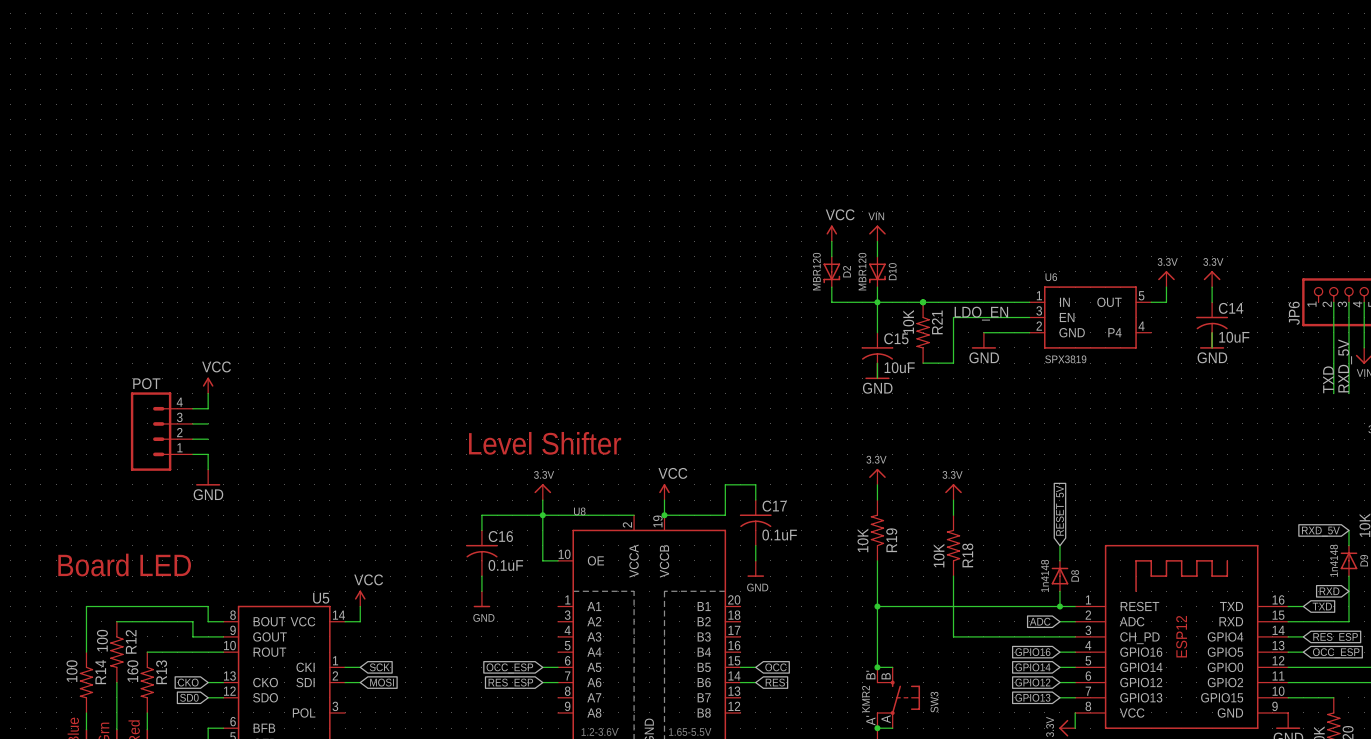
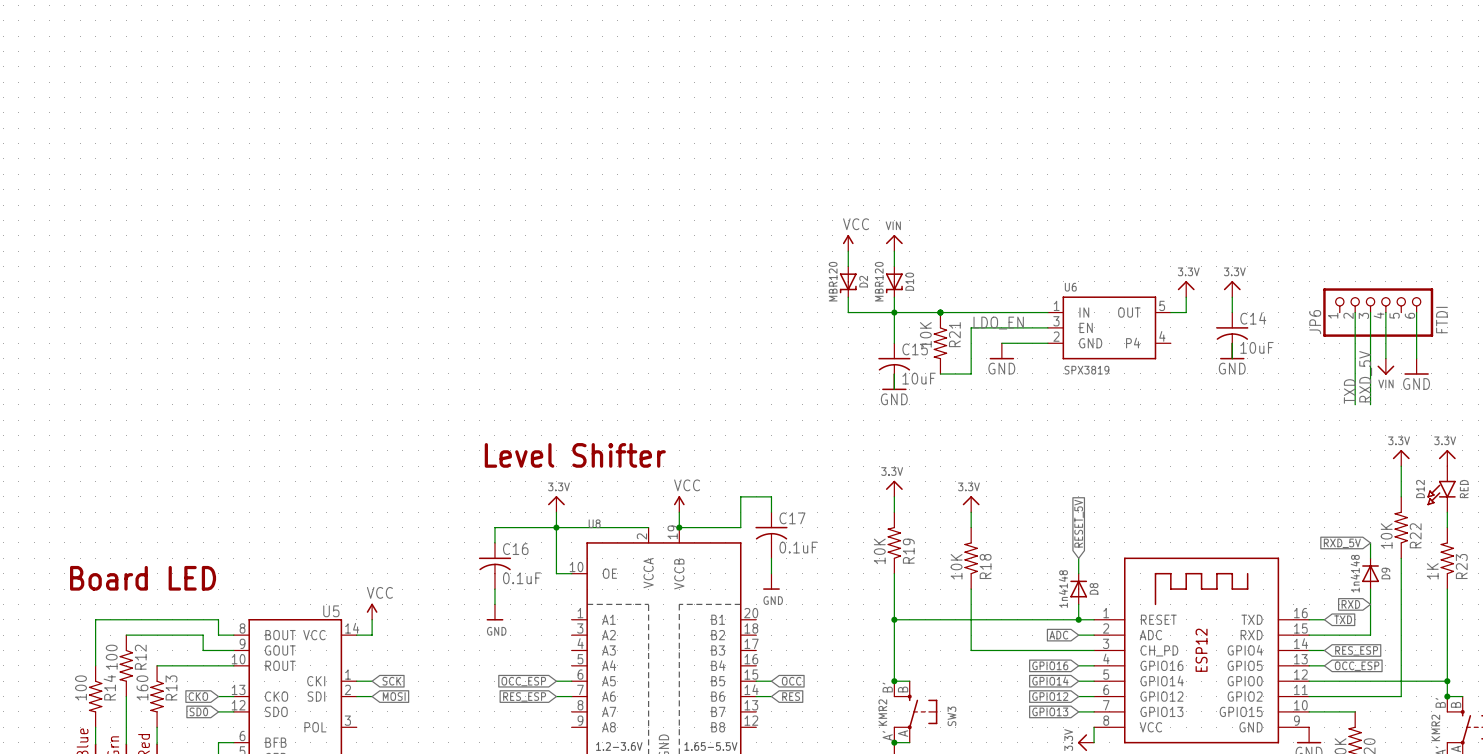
power symbol: VCC (208, 385) -> none
wire: (208, 393) (208, 408) (192, 408) -> none
wire: (192, 423) (208, 423) -> none
POT: (161, 431) -> none
wire: (192, 439) (208, 439) -> none
wire: (192, 454) (208, 454) (208, 469) -> none
power symbol: GND (208, 477) -> none

